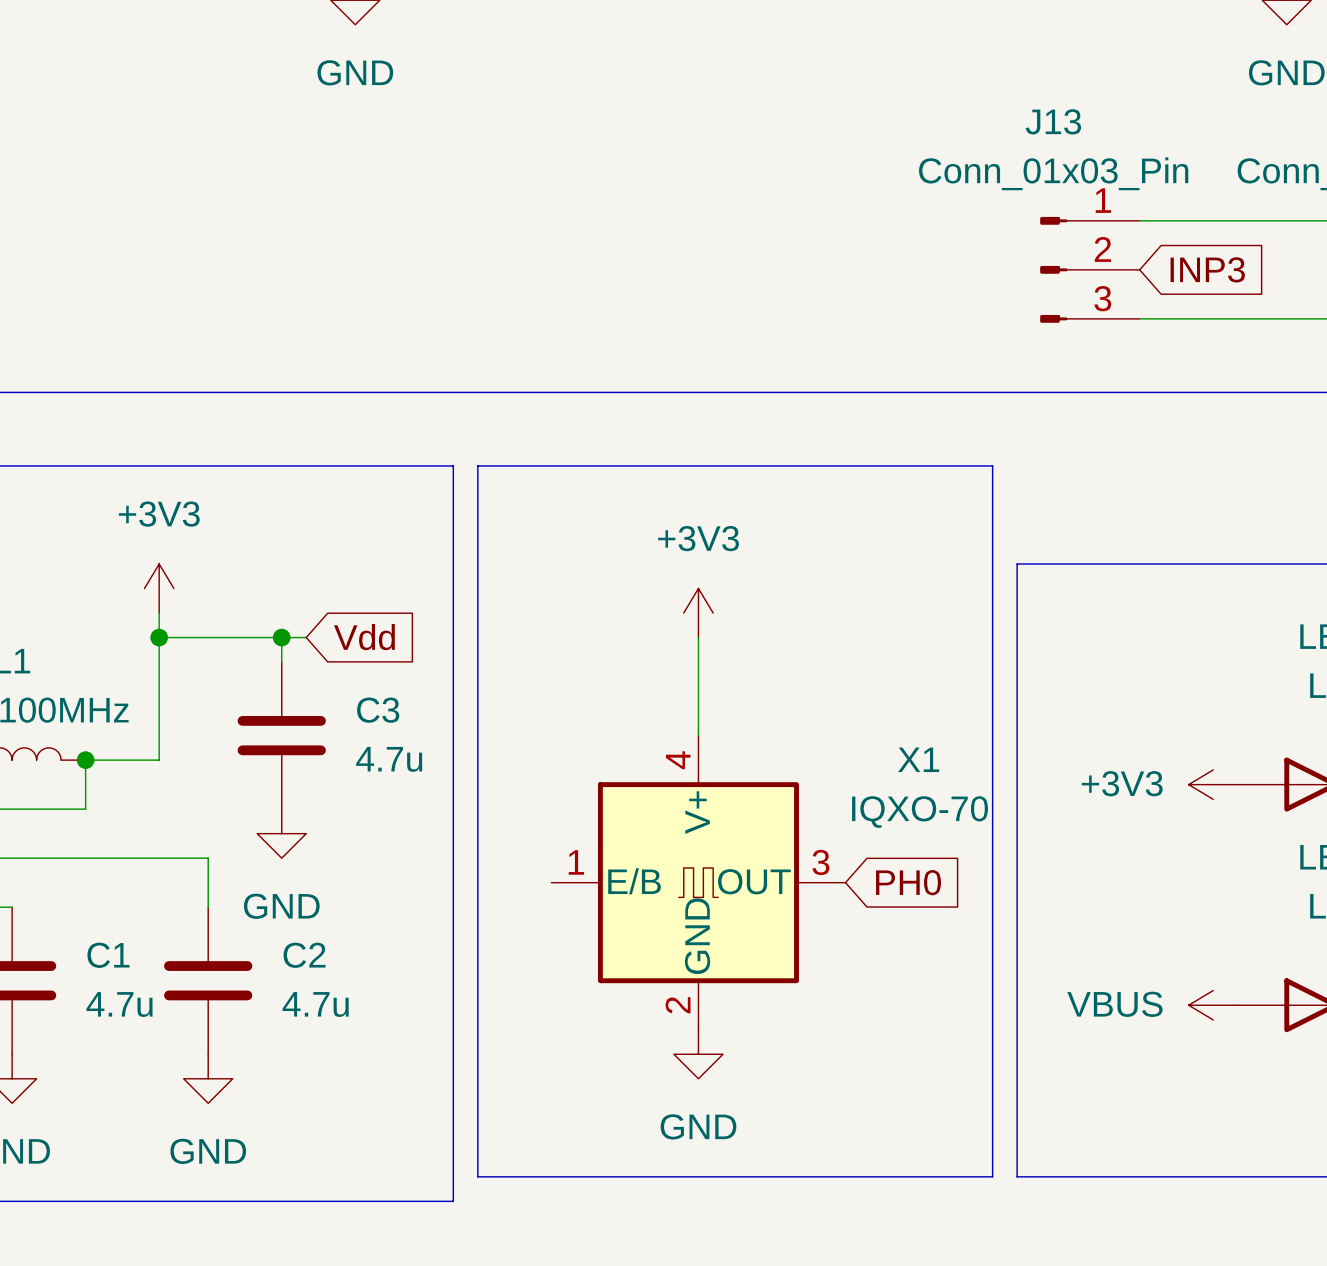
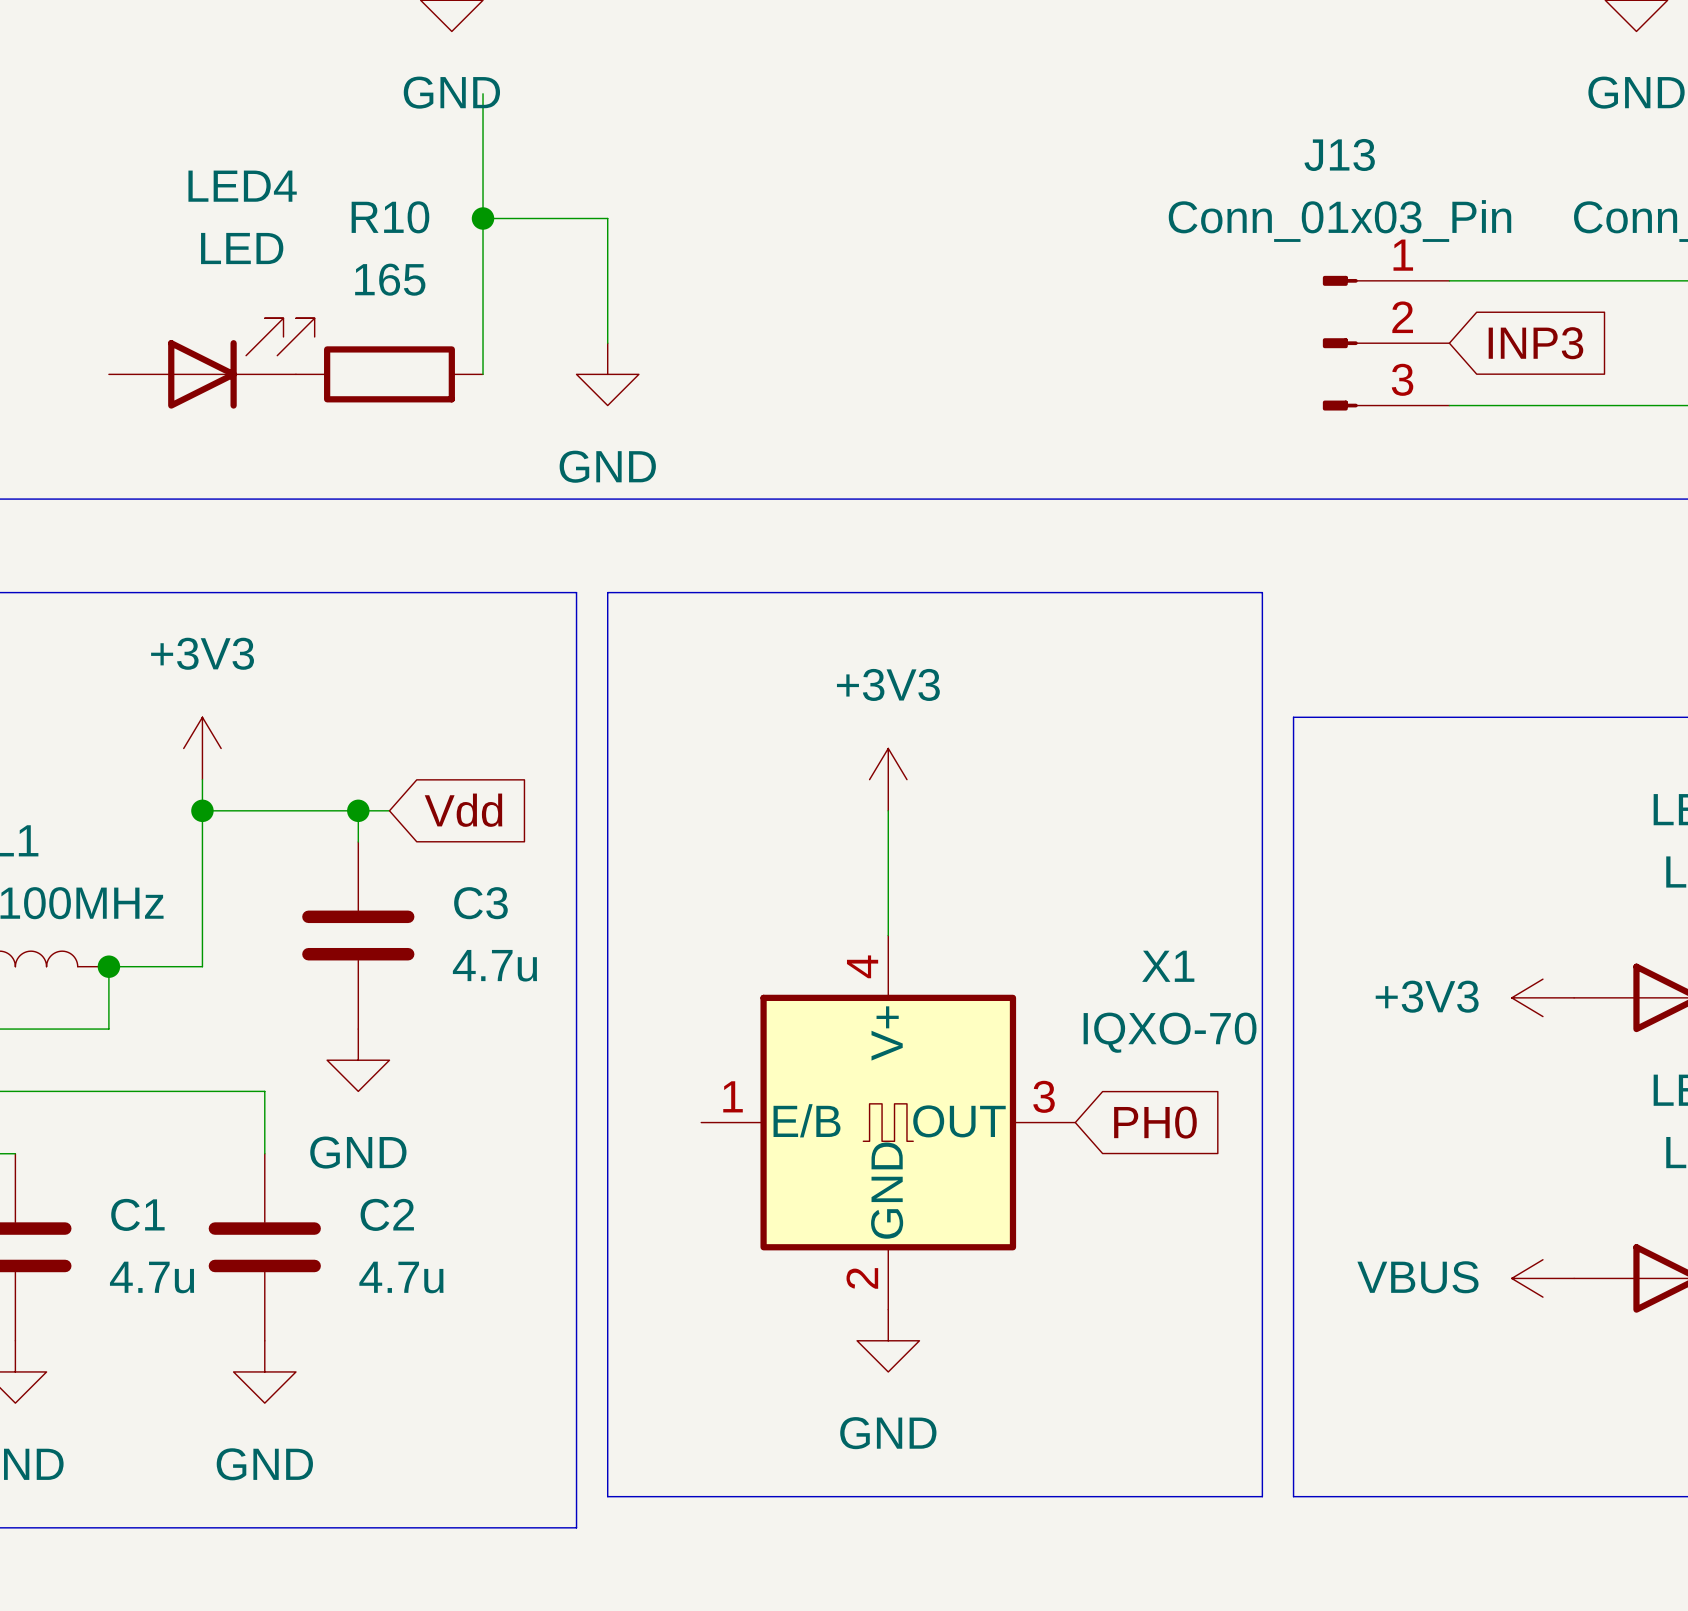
wire: none -> (483, 93) (483, 374)
wire: none -> (483, 218) (607, 218) (607, 343)
junction: none -> (483, 218)
LED4: none -> LED (211, 363)
R10: none -> 165 (389, 374)
power symbol: none -> GND (607, 374)

